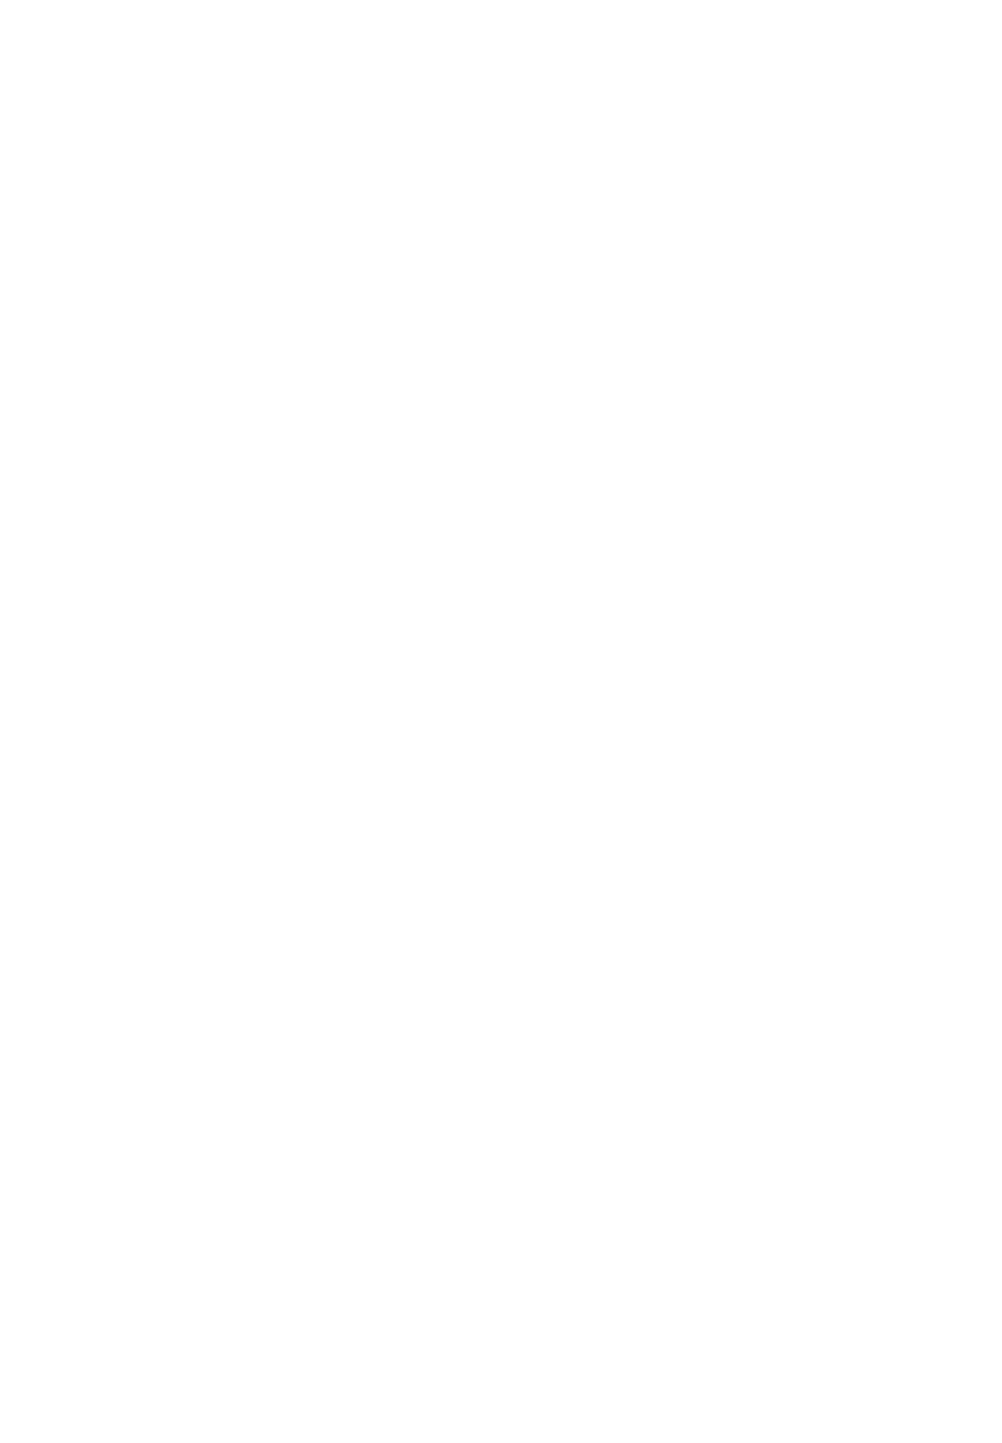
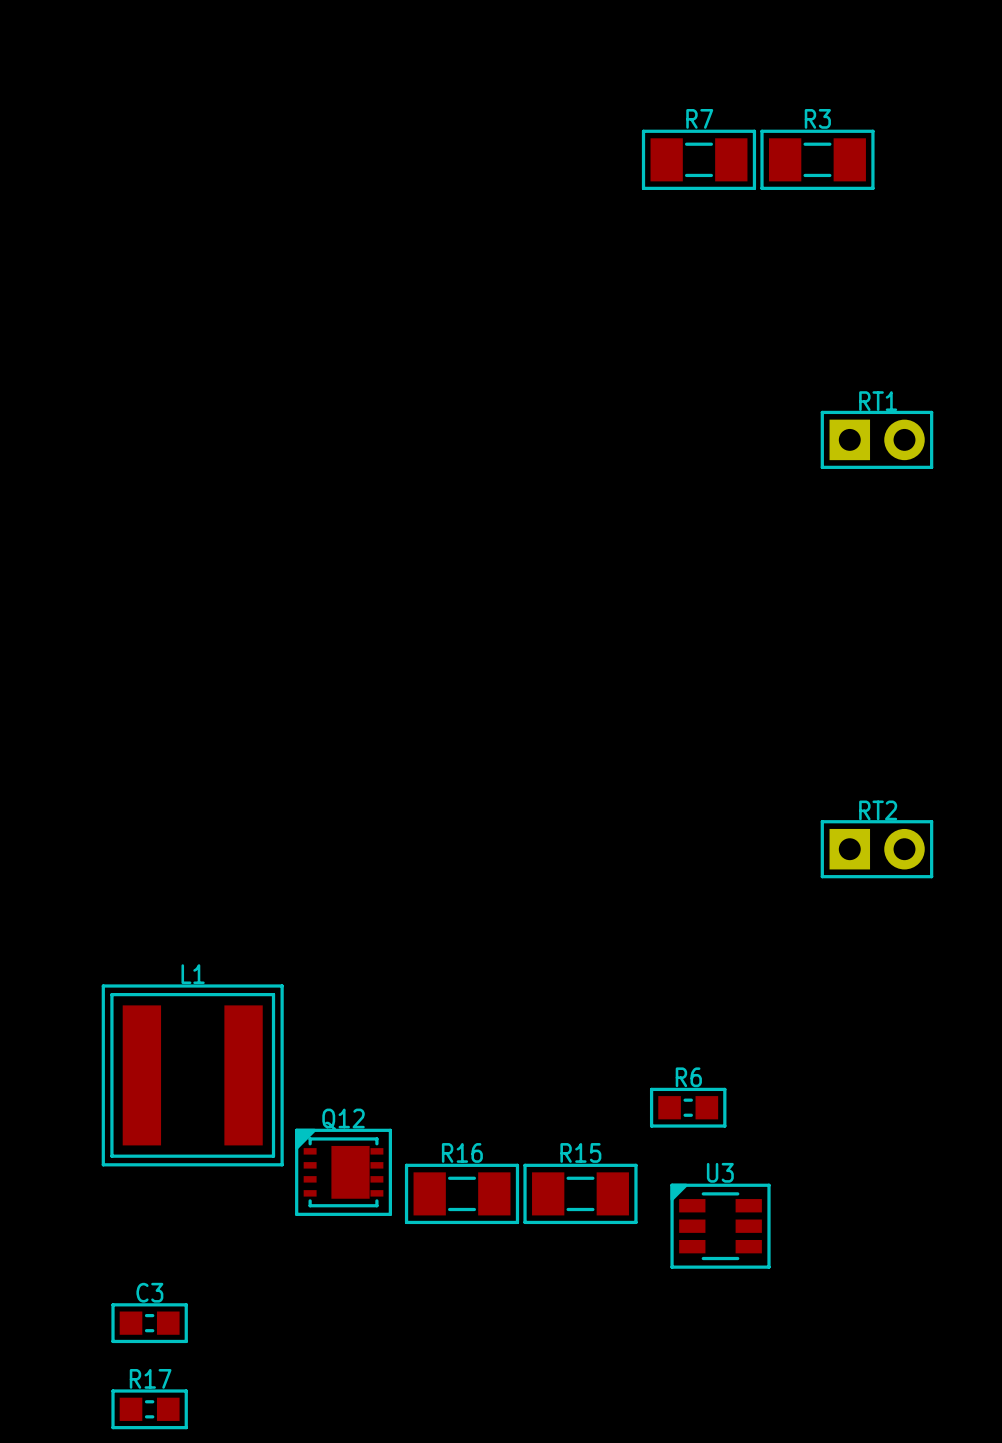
R7: none -> (698, 159)
R3: none -> (817, 159)
RT1: none -> (876, 439)
RT2: none -> (876, 849)
L1: none -> (192, 1075)
R6: none -> (688, 1107)
Q12: none -> (343, 1172)
R16: none -> (462, 1193)
R15: none -> (580, 1193)
U3: none -> (720, 1226)
C3: none -> (149, 1323)
R17: none -> (149, 1409)

